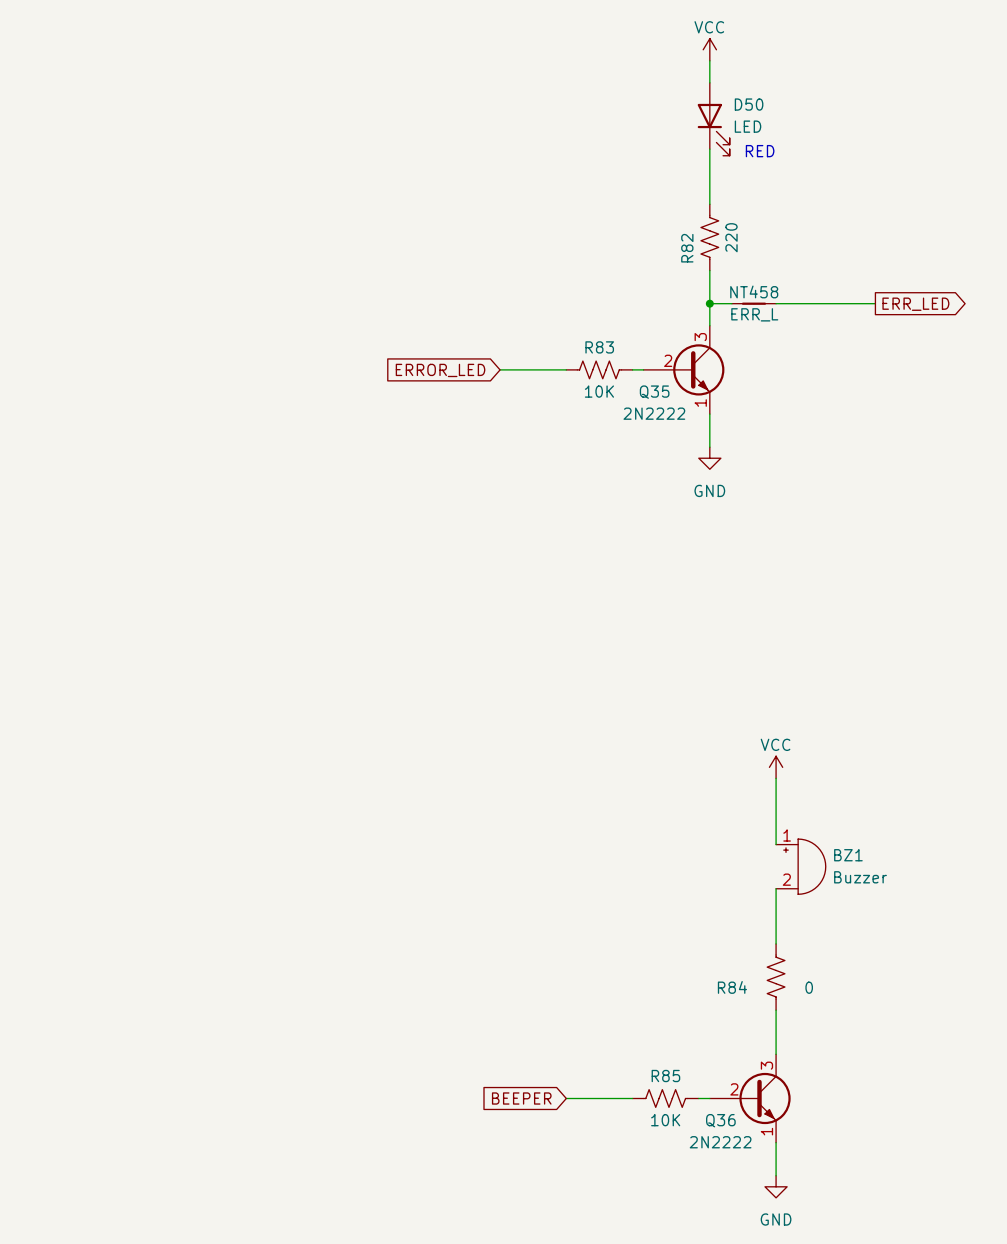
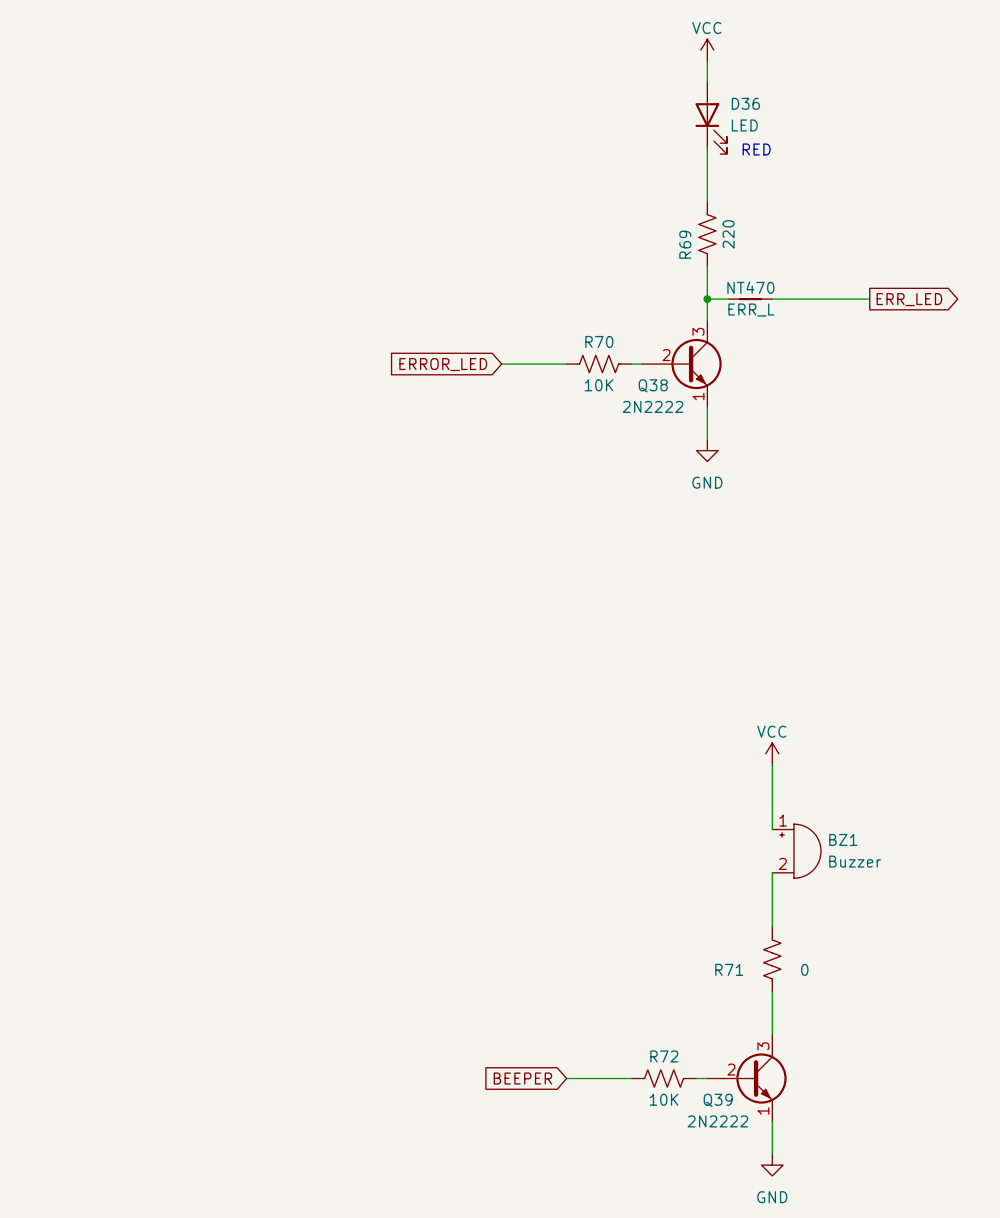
D50 name: D50 (749, 104) -> D36 (745, 103)
R82 name: R82 (687, 248) -> R69 (685, 244)
NT458 name: NT458 (754, 291) -> NT470 (750, 287)
R83 name: R83 (599, 347) -> R70 (599, 341)
Q35 name: Q35 (654, 392) -> Q38 (653, 385)
R84 name: R84 (732, 987) -> R71 (729, 969)
R85 name: R85 (665, 1076) -> R72 (664, 1056)
Q36 name: Q36 (720, 1120) -> Q39 (718, 1100)

